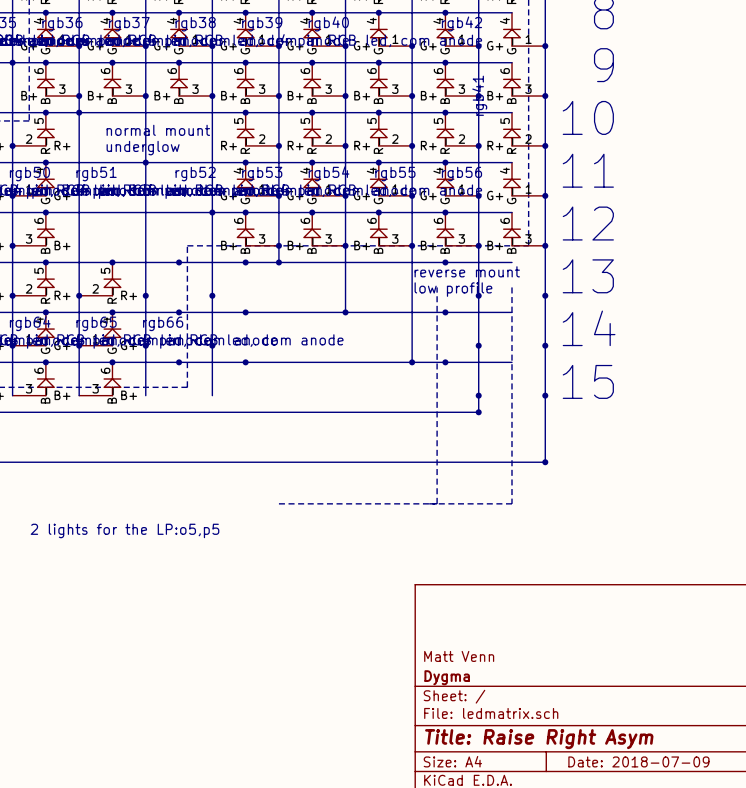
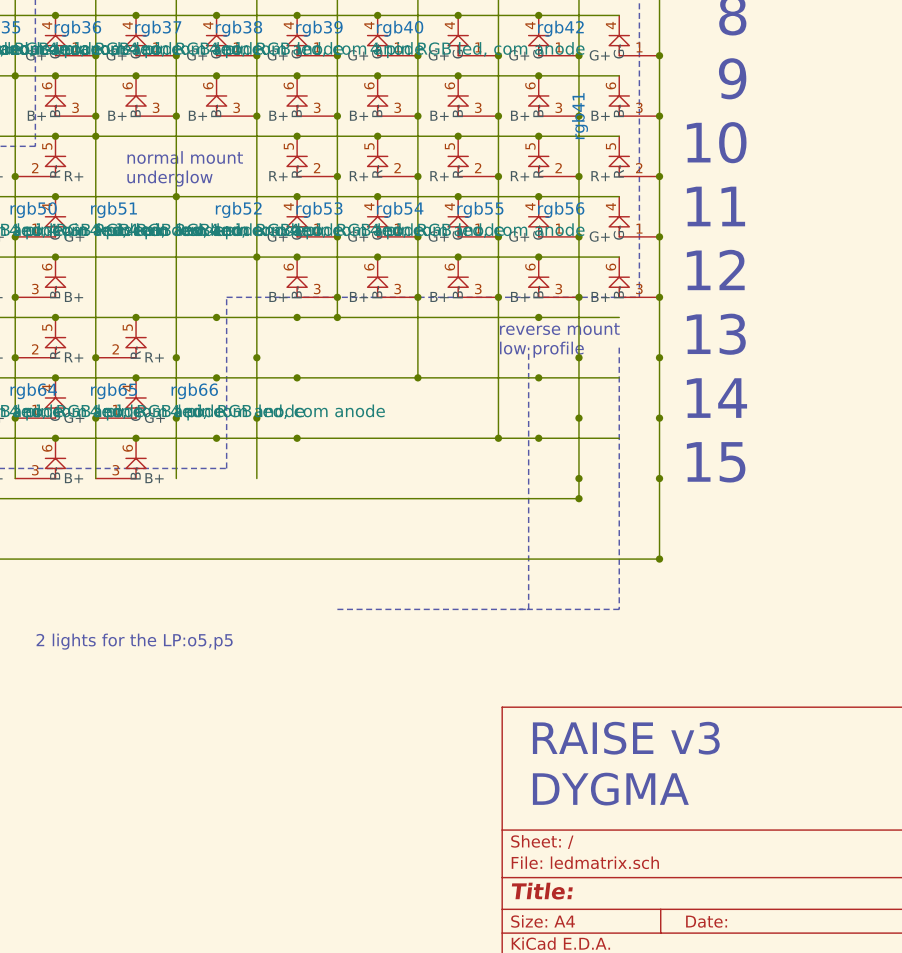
text: none -> RAISE v3 (626, 738)
text: none -> DYGMA (610, 789)
title block: Matt Venn (459, 656) -> none
title block: Dygma (447, 677) -> none
title block: Title: Raise Right Asym (539, 739) -> Title: (542, 891)
title block: Date: 2018-07-09 (638, 761) -> Date: (706, 921)

